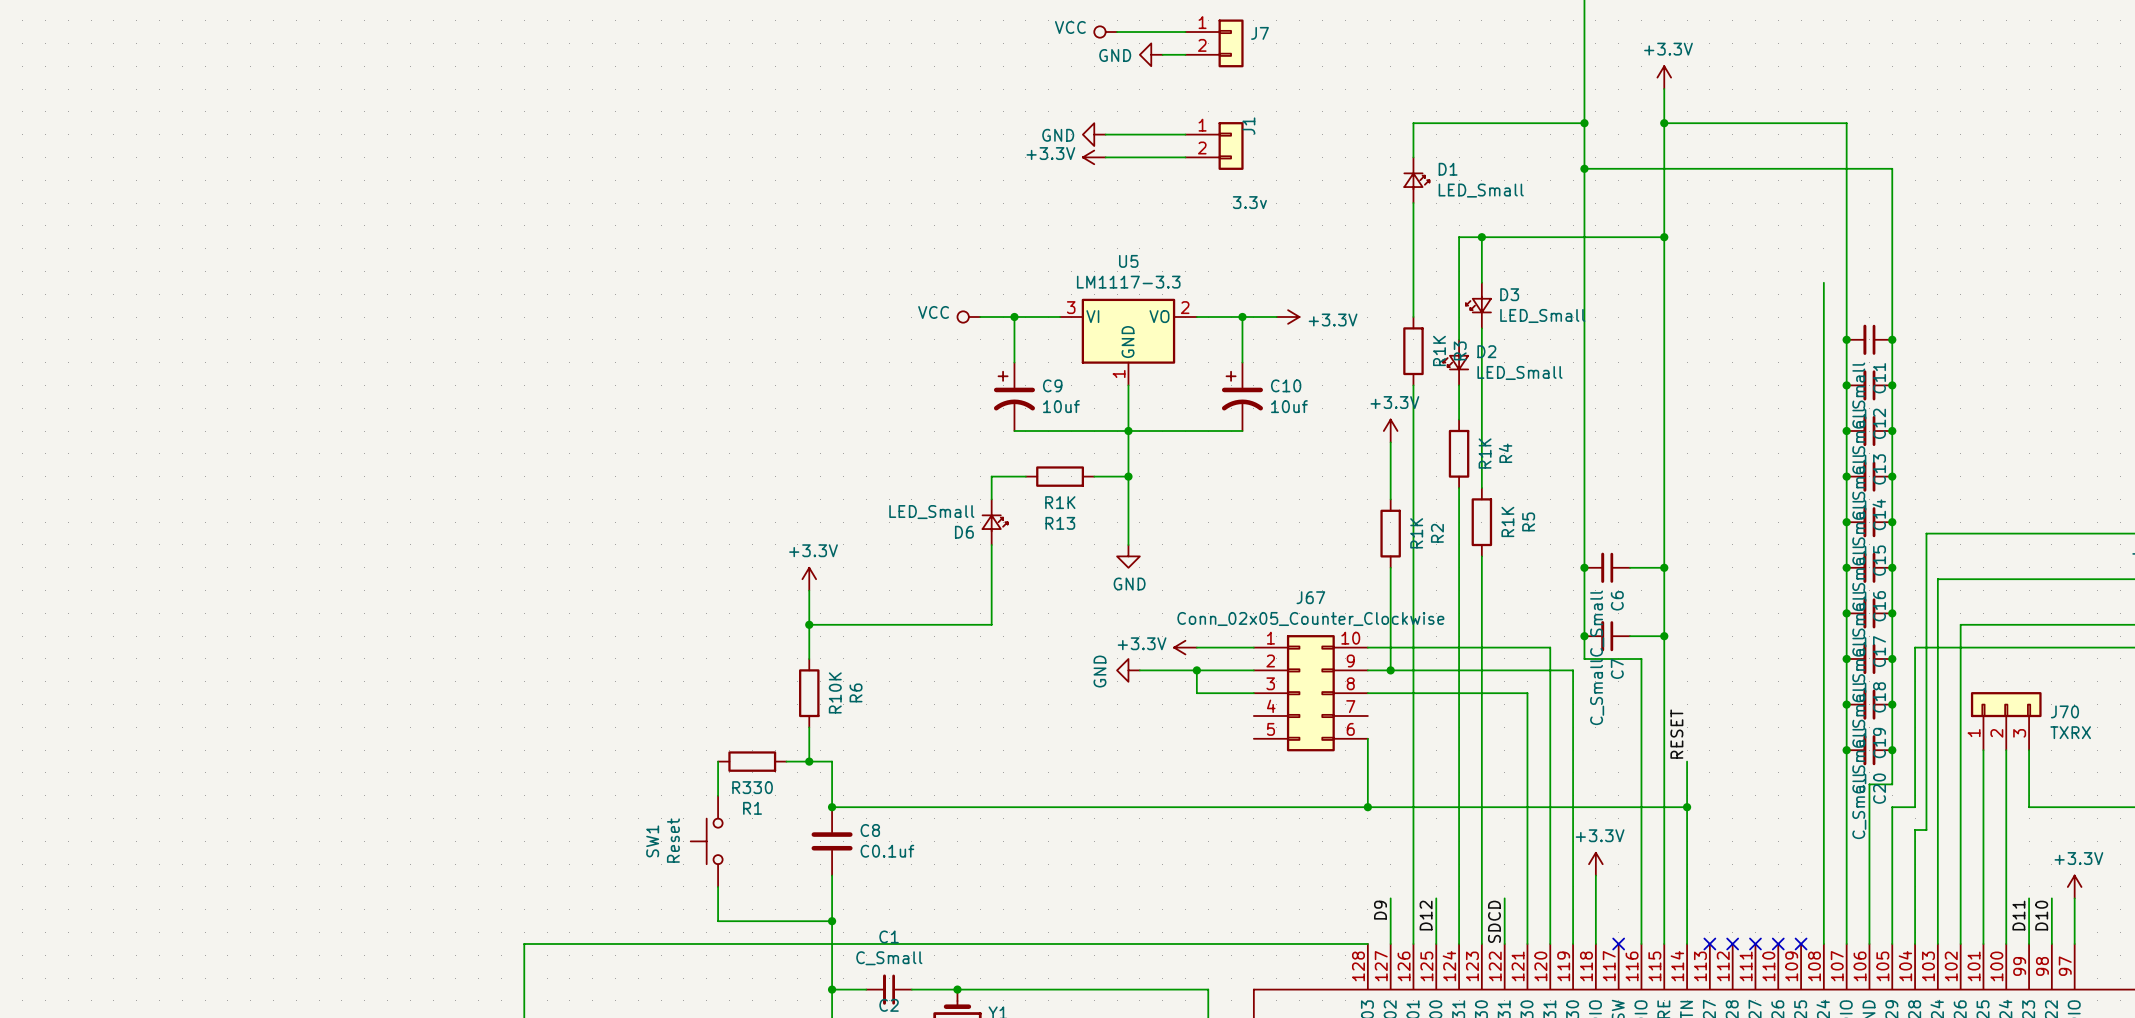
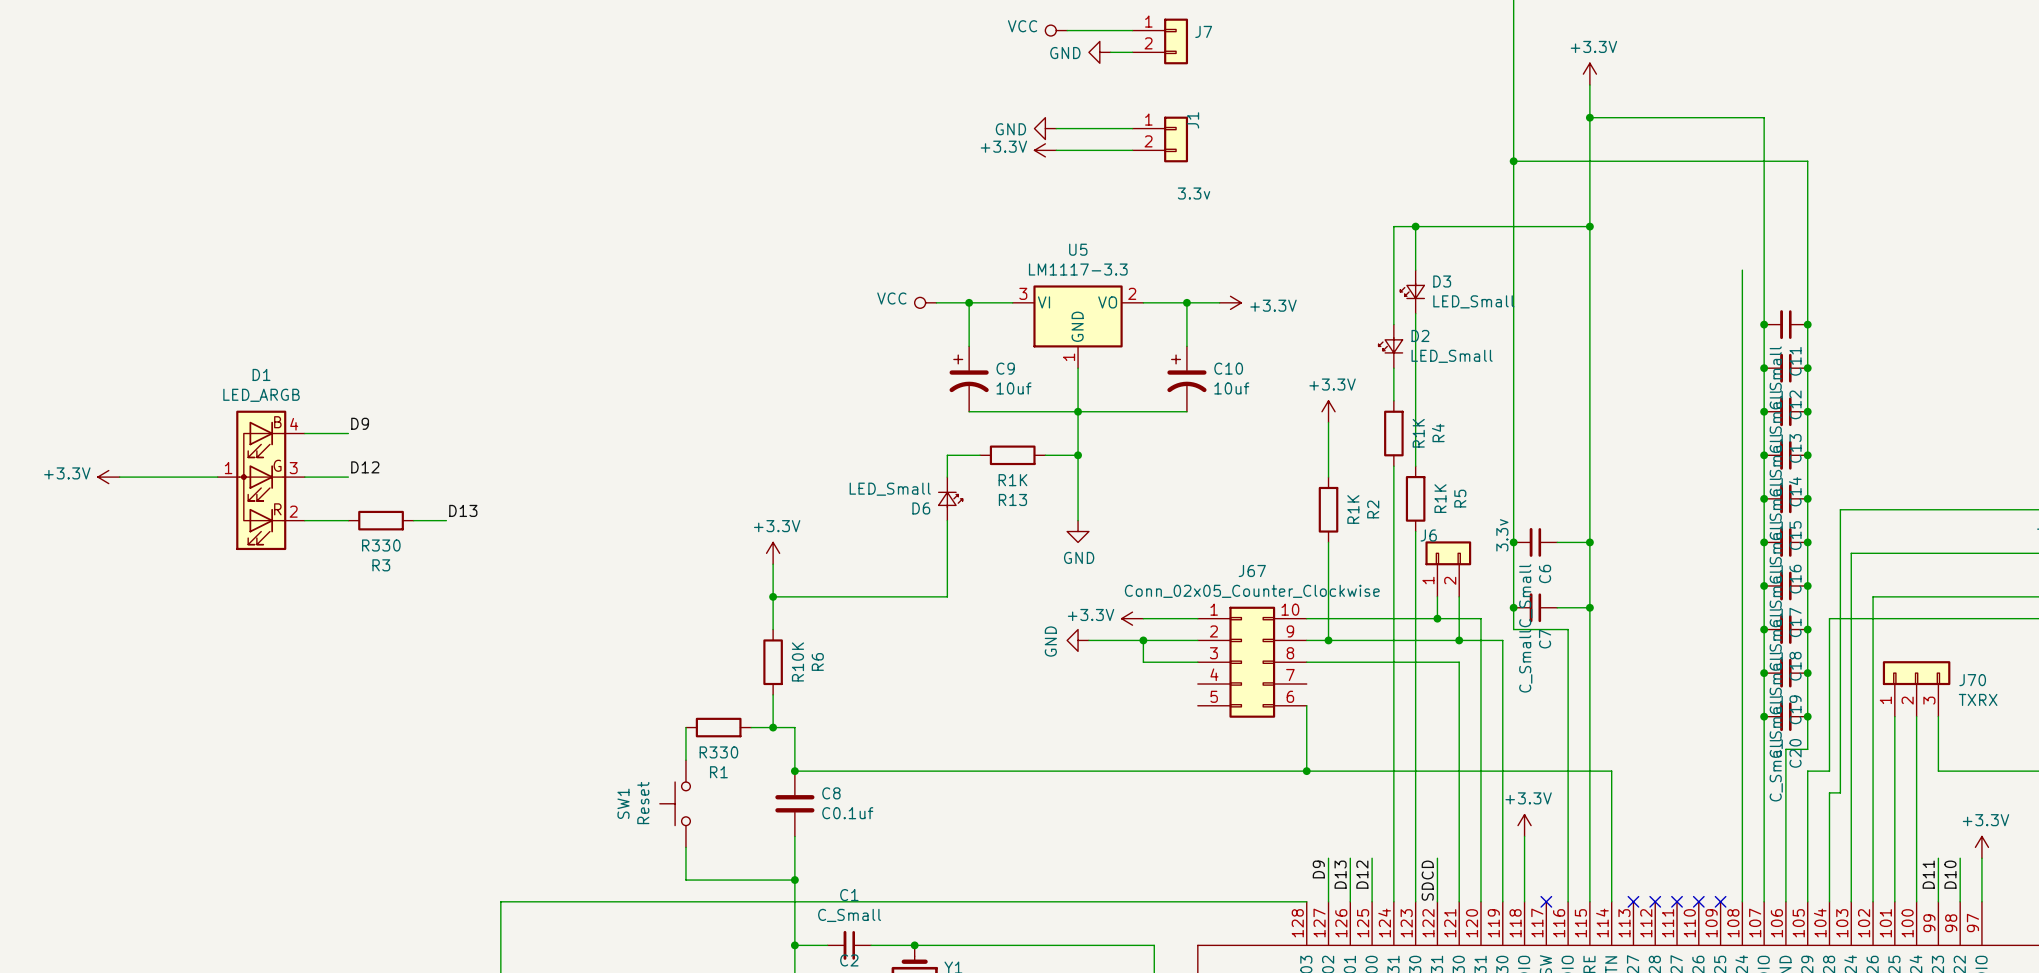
wire: (1584, 123) (1413, 123) (1413, 157) -> none
junction: (1584, 123) -> none
D1 symbol: [1404, 157, 1430, 204] -> [217, 410, 305, 551]
D1 name position: D1 (1448, 169) -> D1 (261, 374)
D1 value: LED_Small (1481, 190) -> LED_ARGB (261, 395)
wire: (1413, 203) (1413, 317) -> none
R3 value: R1K (1439, 350) -> R330 (381, 545)
R3 rotation: 0° (1413, 351) -> 90° clockwise (381, 520)
R3 position: (1413, 351) -> (381, 520)
wire: (1413, 385) (1413, 898) -> none
label: none -> D9 (360, 423)
wire: none -> (304, 433) (348, 433)
label: none -> D12 (365, 467)
power symbol: none -> +3.3V (108, 477)
wire: none -> (119, 477) (217, 477)
wire: none -> (304, 477) (348, 477)
label: none -> D13 (463, 510)
wire: none -> (304, 520) (348, 520)
wire: none -> (413, 520) (446, 520)
J6: none -> 3.3v (1448, 569)
wire: none -> (1437, 596) (1437, 618)
junction: none -> (1437, 618)
junction: none -> (1459, 640)
label: RESET (1676, 734) -> none
wire: (1687, 761) (1687, 807) -> (1459, 596) (1459, 640)
junction: (1687, 807) -> none
label: none -> D13 (1340, 874)

